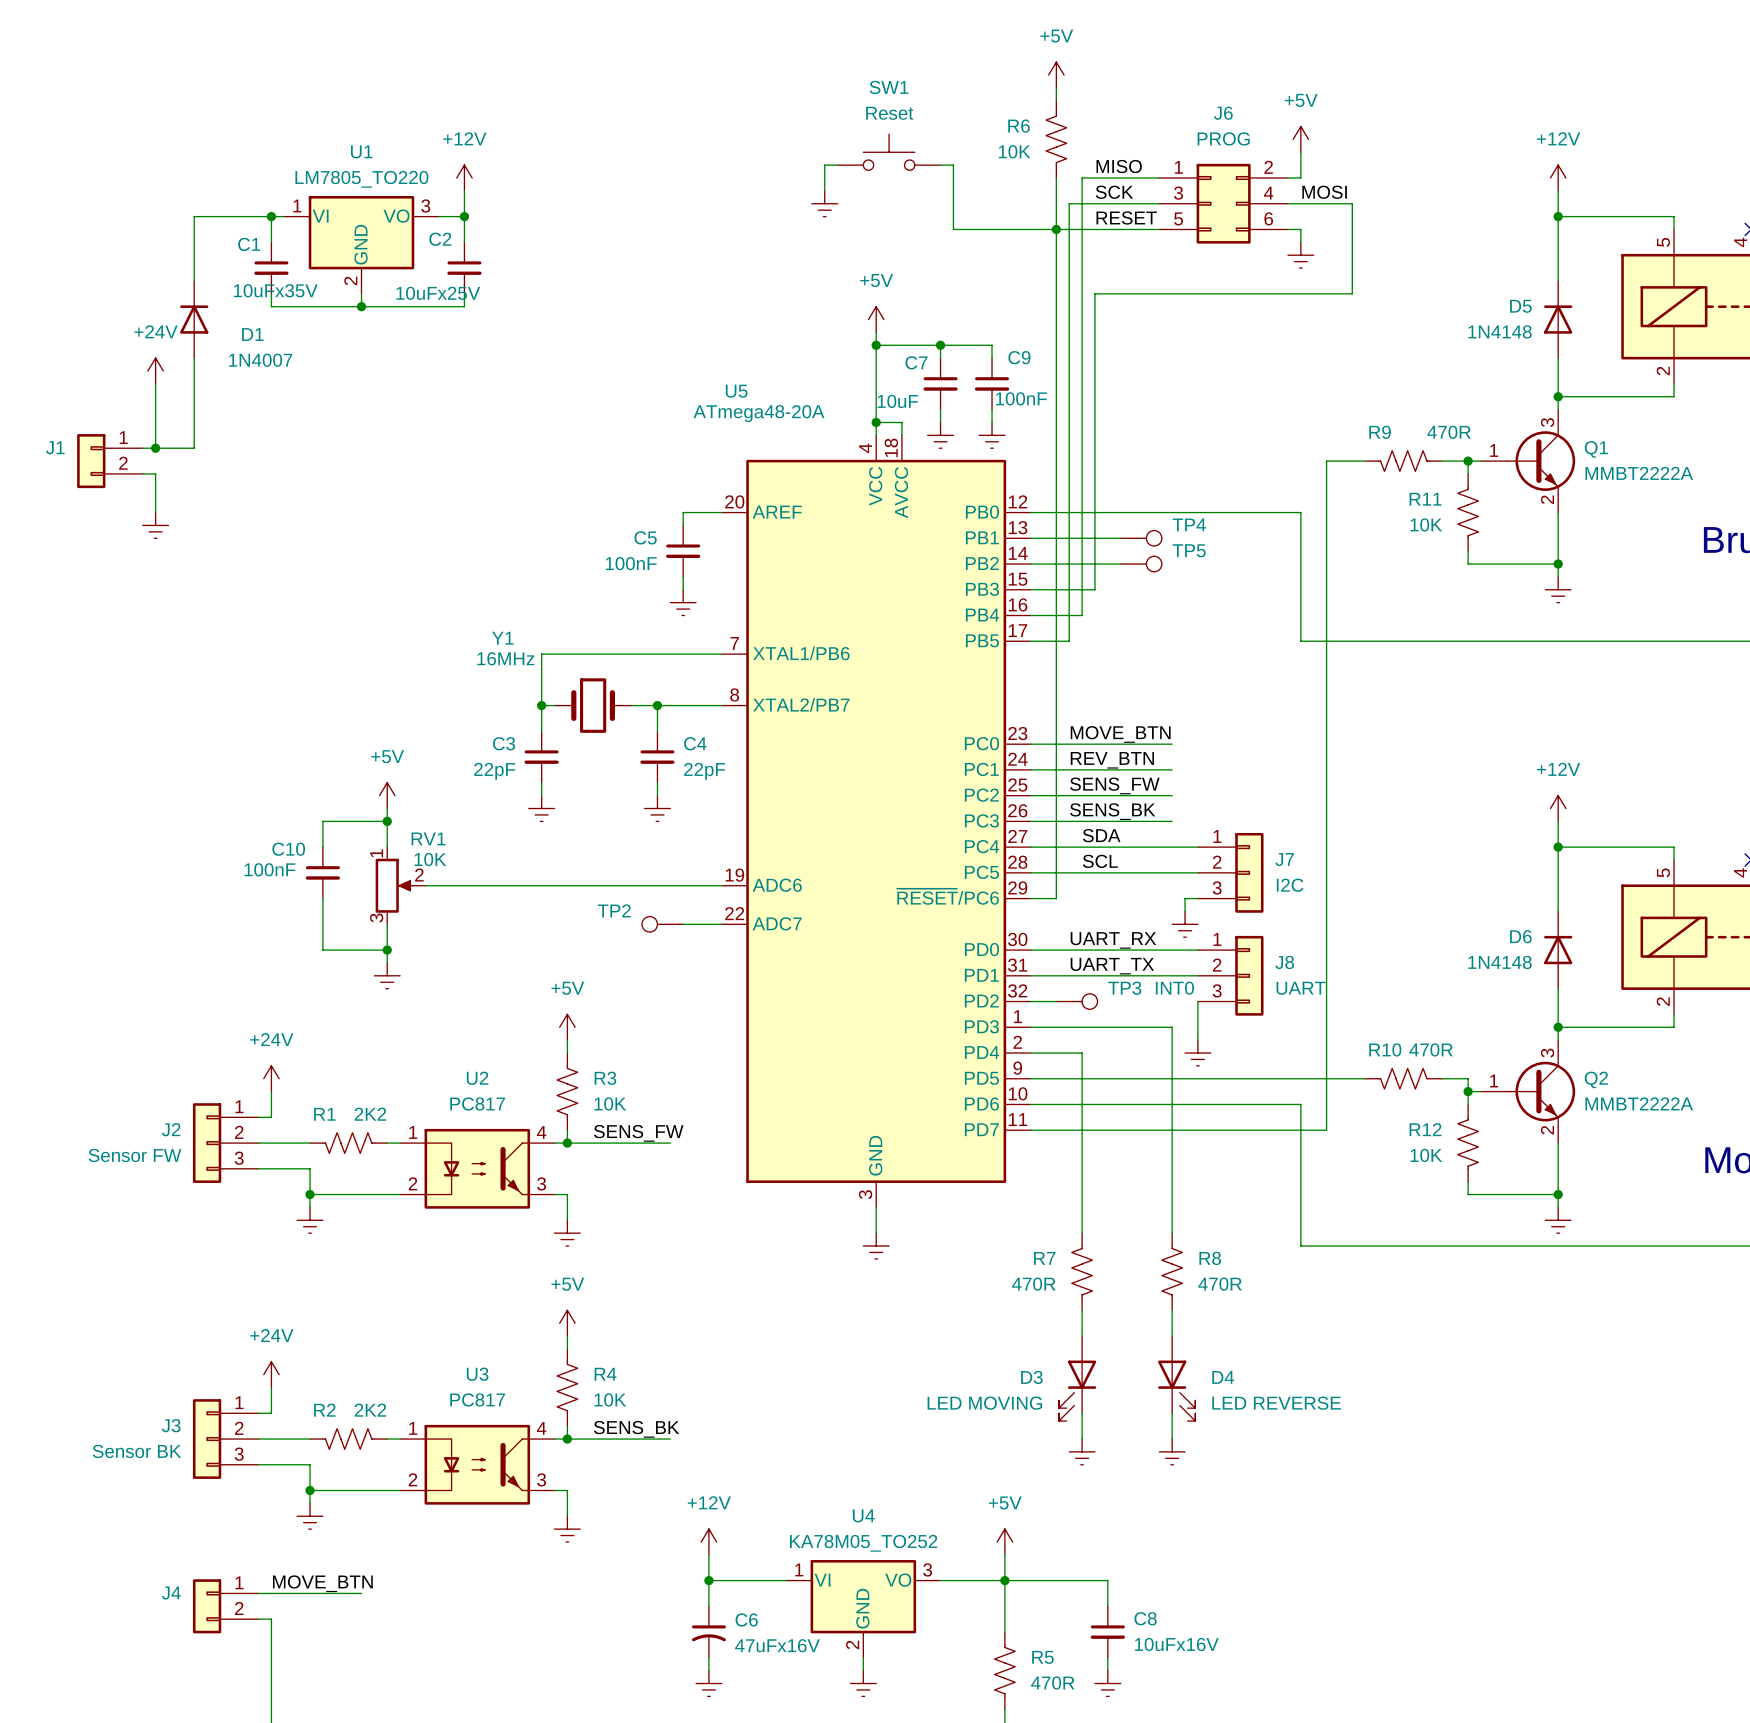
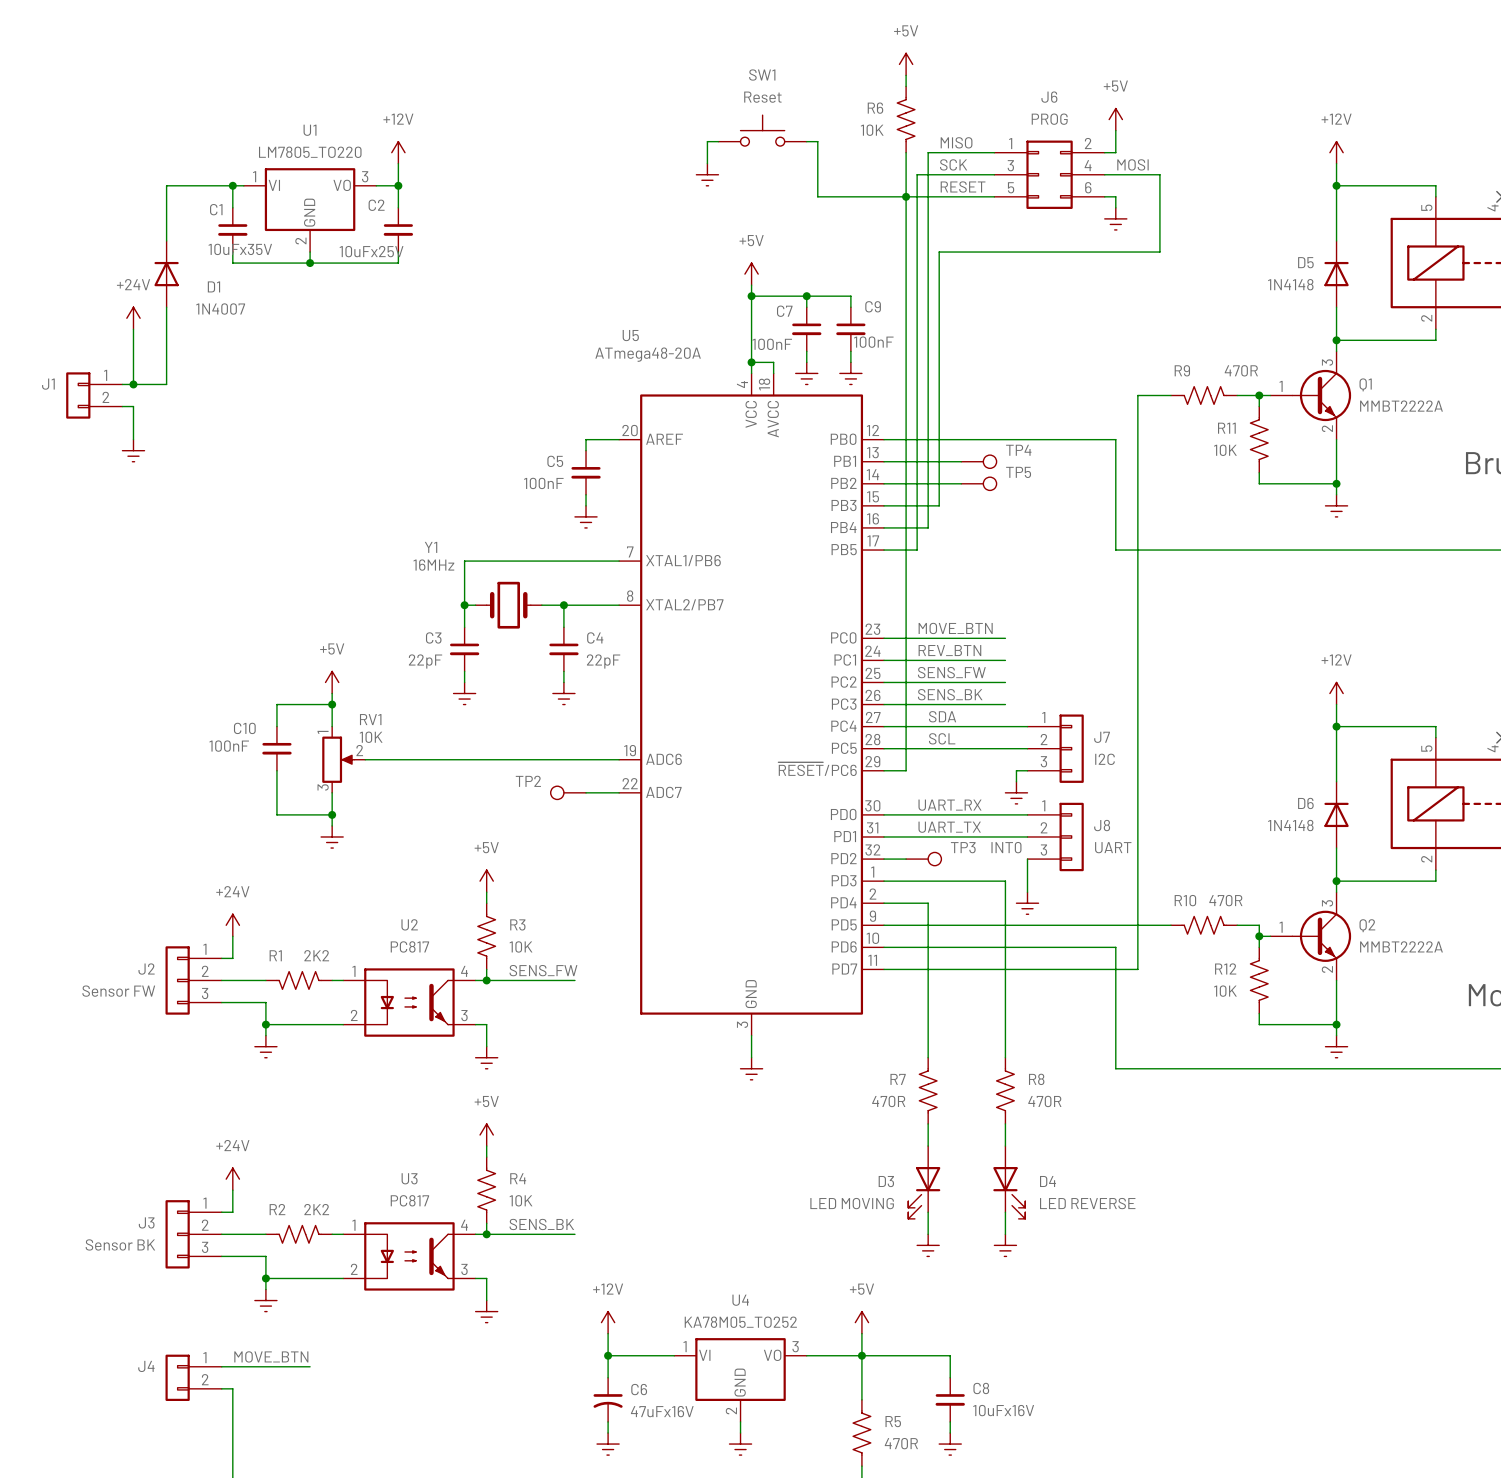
C7 value: 10uF (897, 401) -> 100nF (772, 344)

